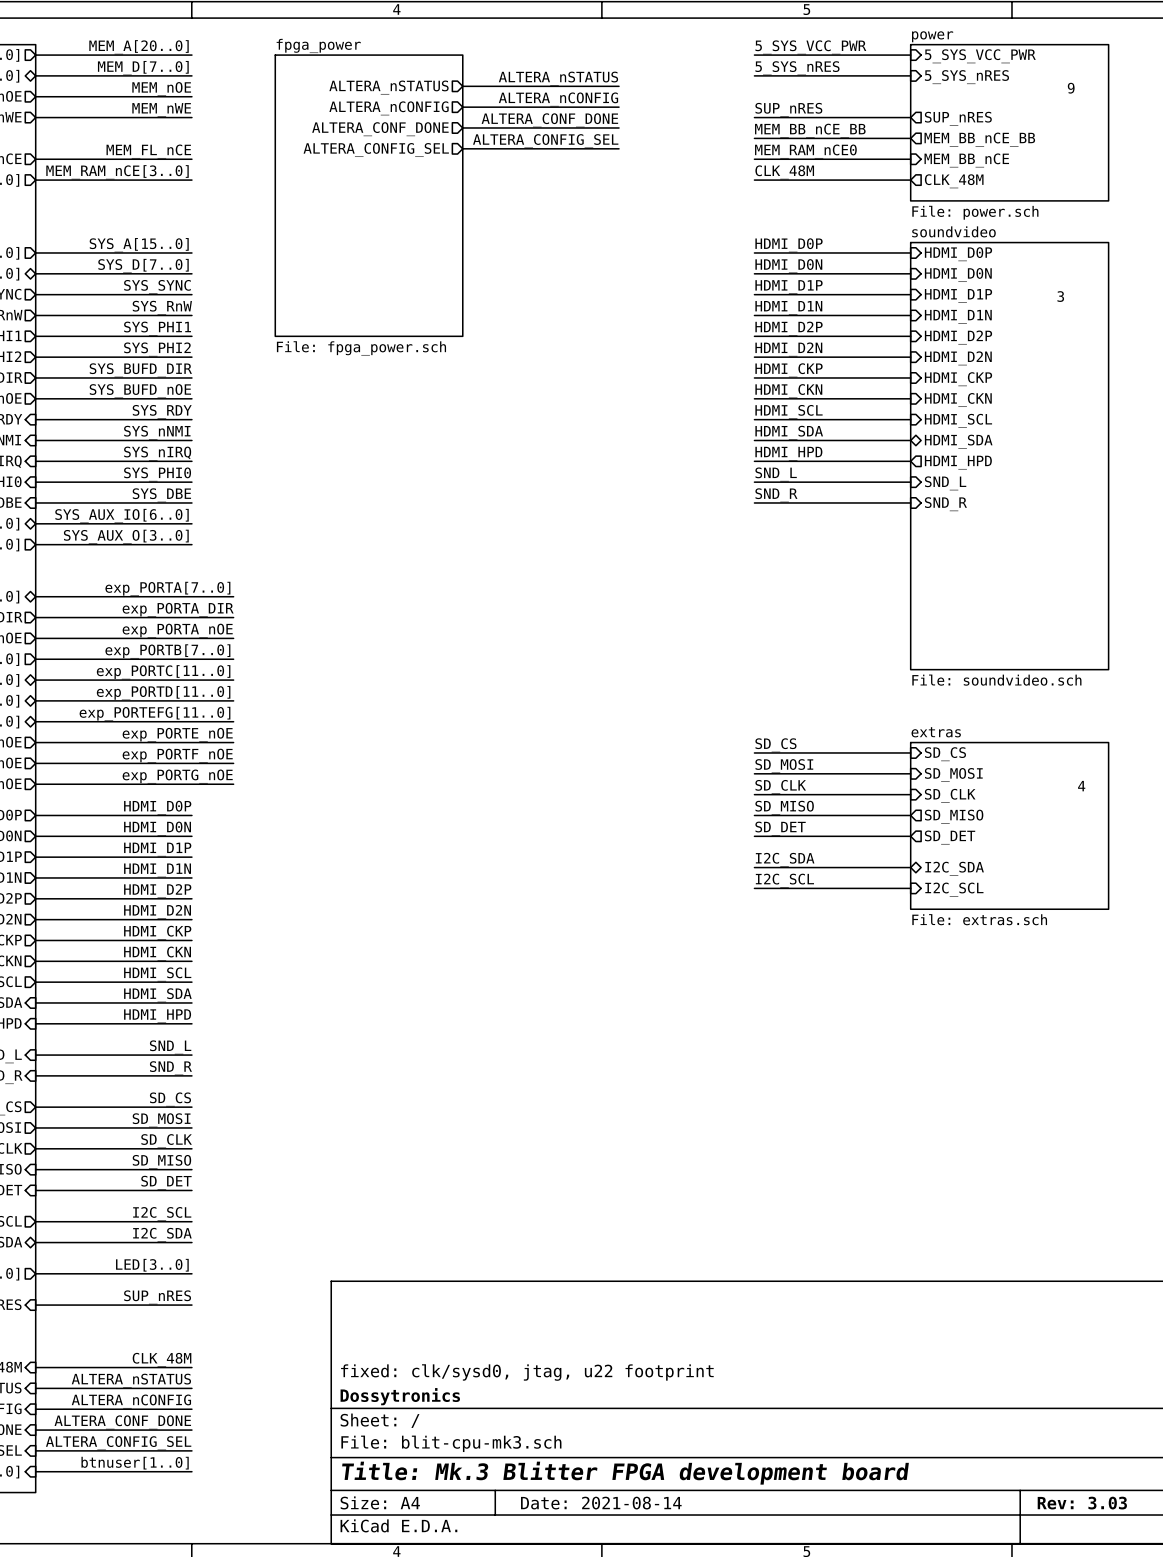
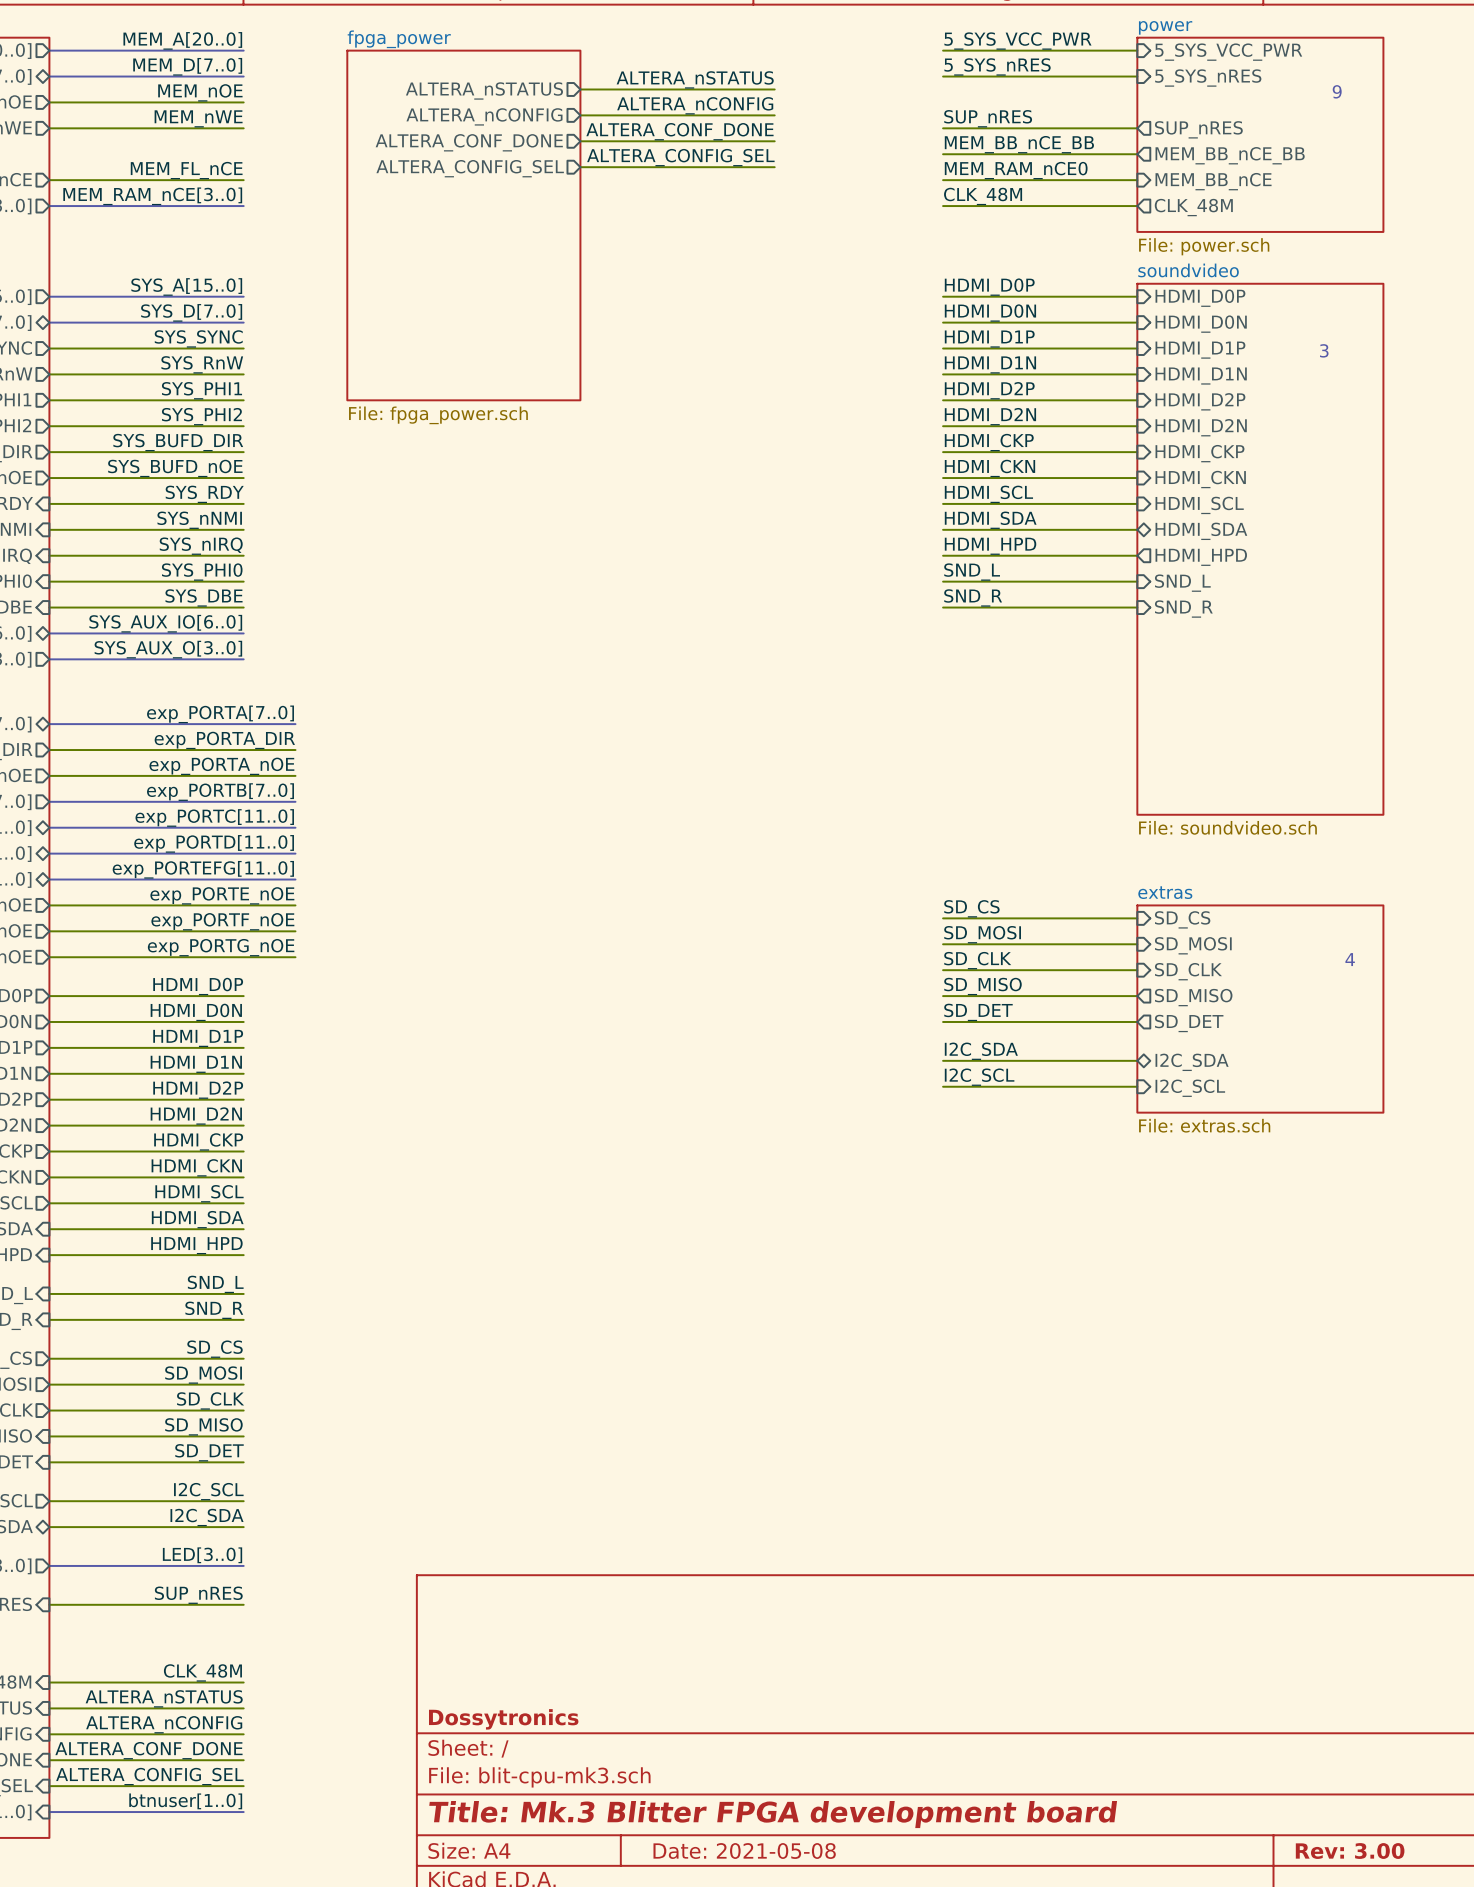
title block: fixed: clk/sysd0, jtag, u22 footprint (527, 1372) -> none
title block: Date: 2021-08-14 (601, 1503) -> Date: 2021-05-08 (744, 1851)
title block: Rev: 3.03 (1082, 1503) -> Rev: 3.00 (1350, 1851)

